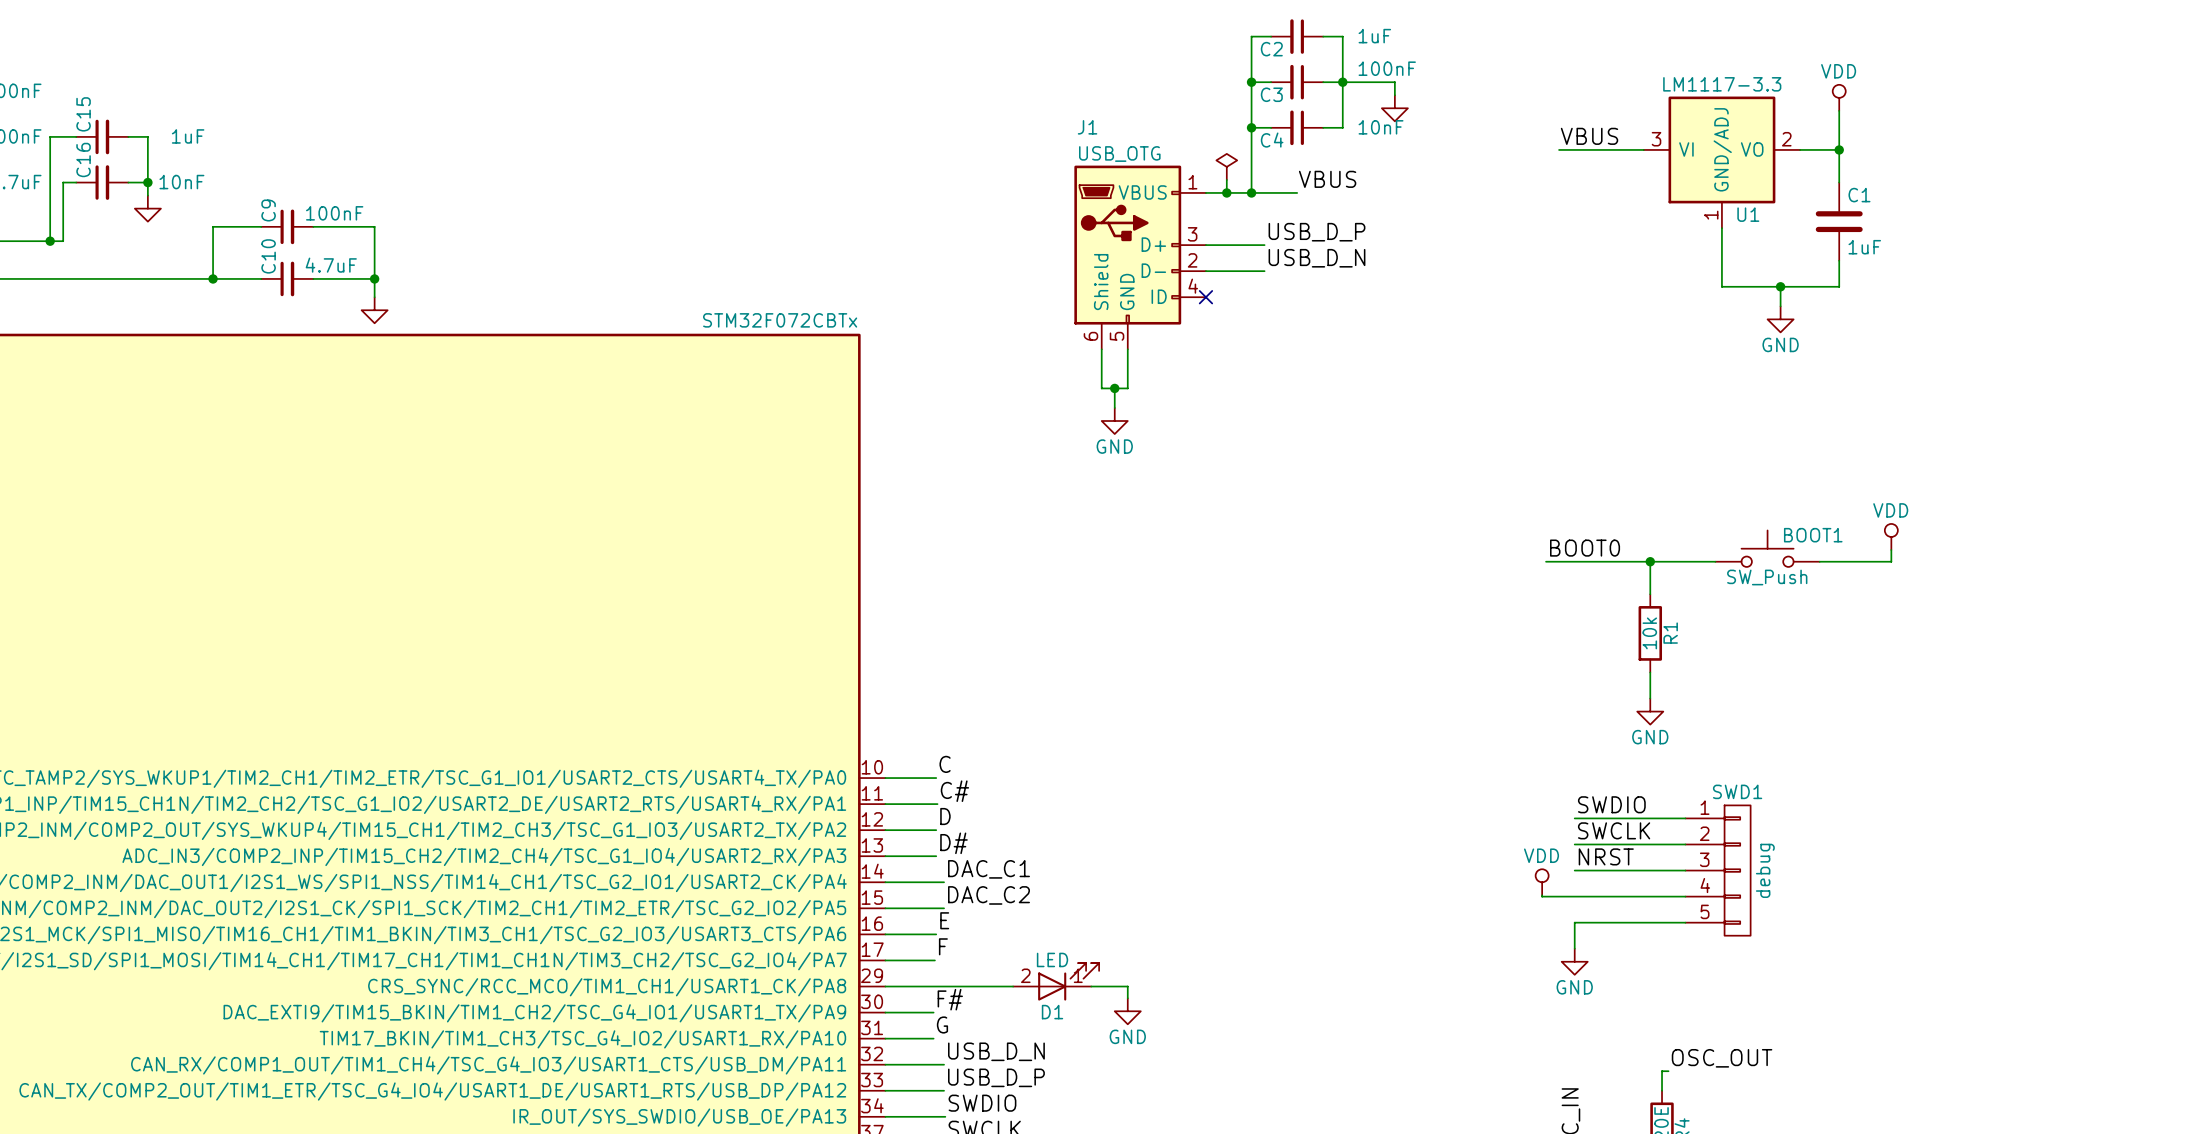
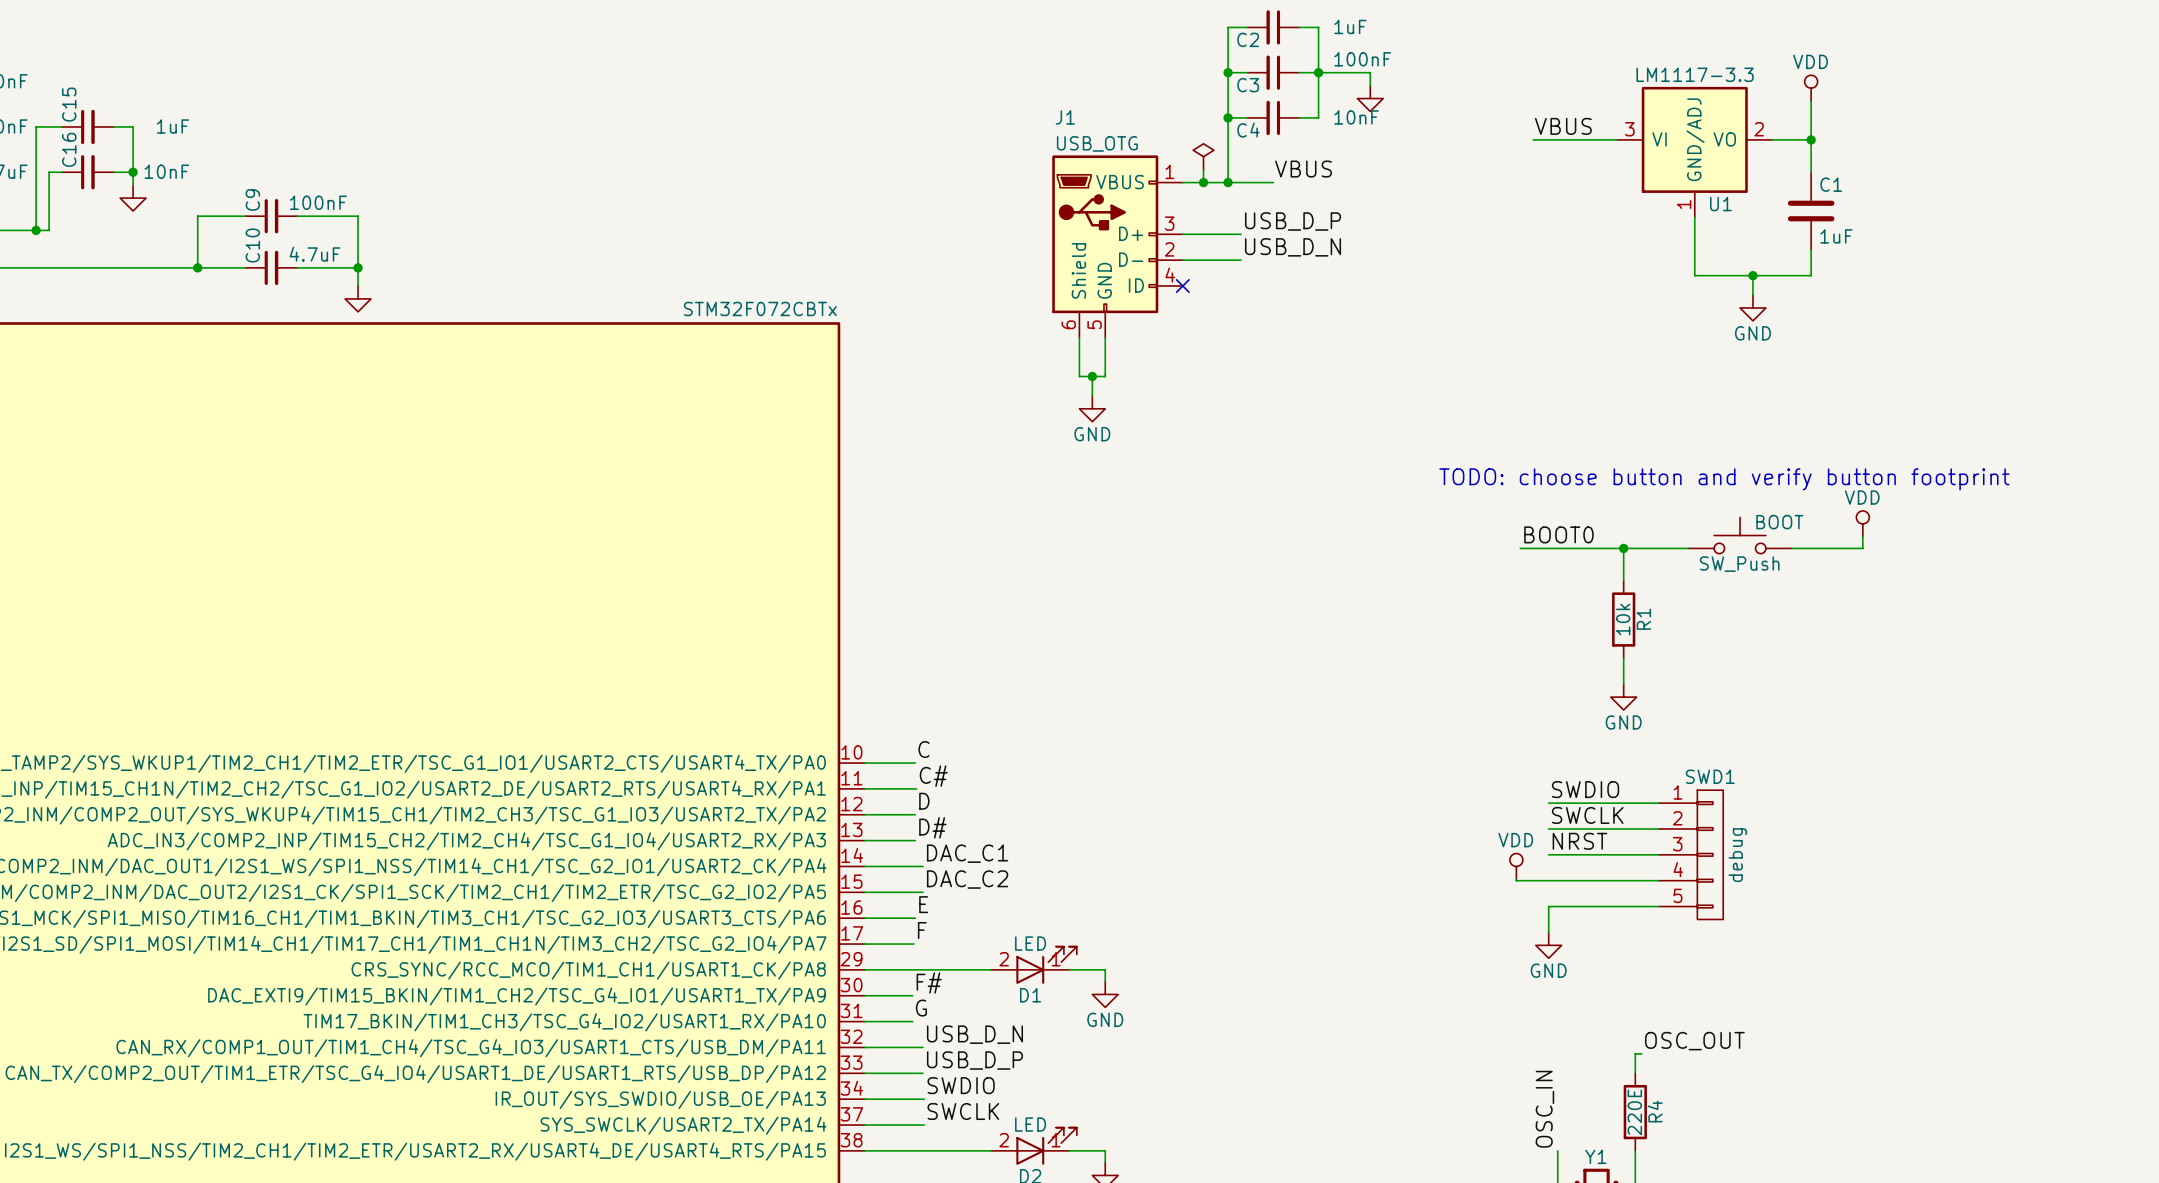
text: none -> TODO: choose button and verify button footprint (1724, 479)
BOOT1 name: BOOT1 (1813, 535) -> BOOT (1779, 522)

